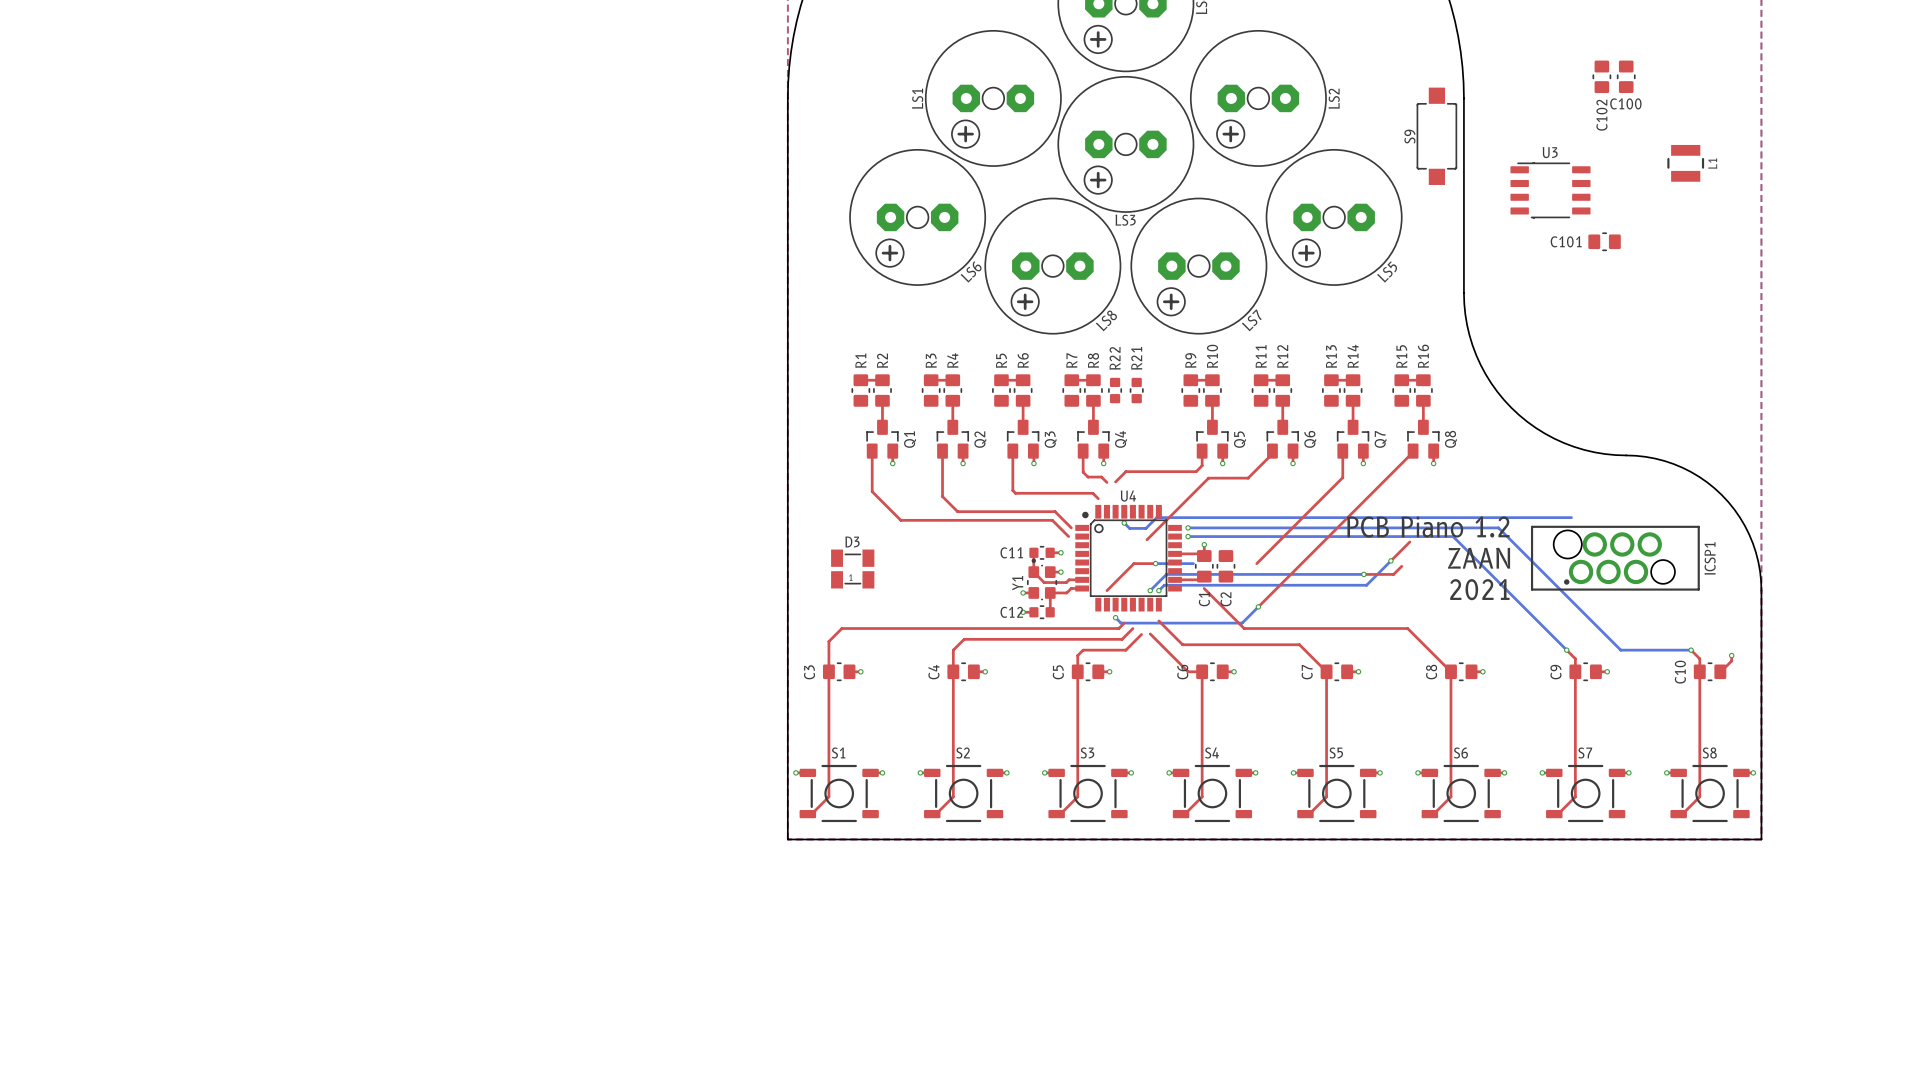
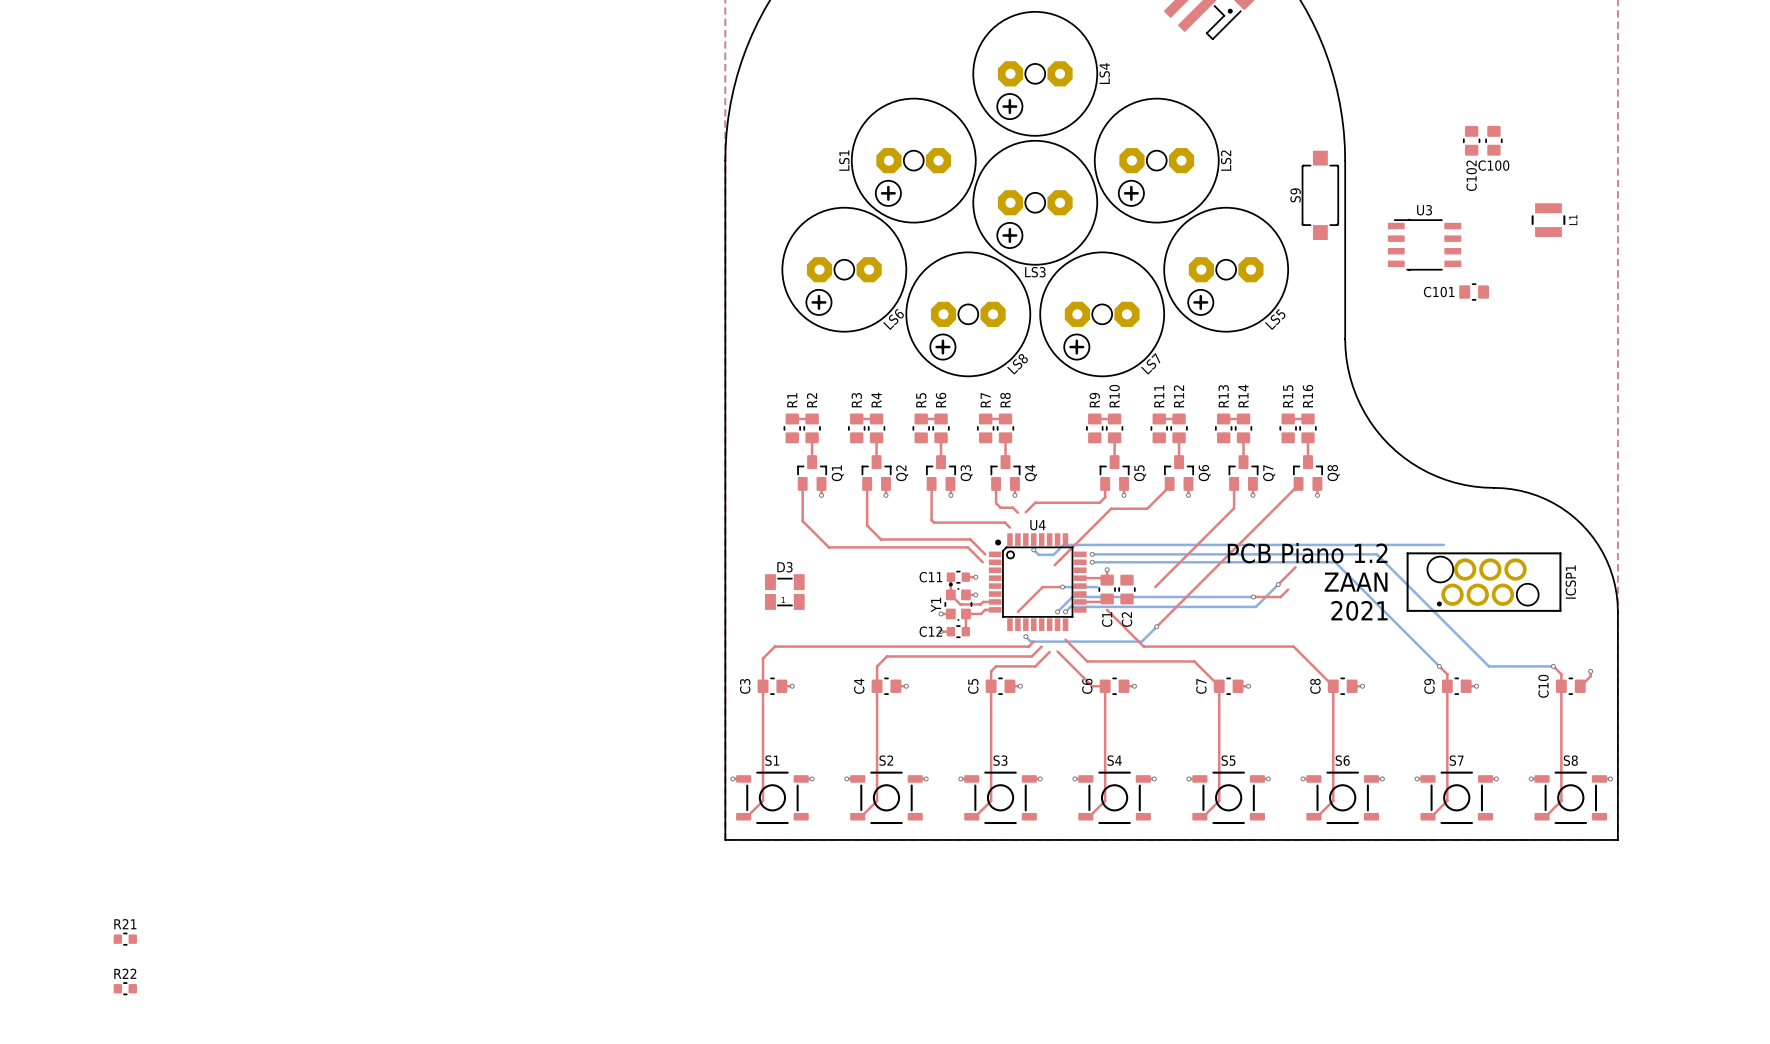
R22 rotation: 0° (1115, 390) -> 90° clockwise (125, 988)
R22 position: (1115, 390) -> (125, 988)
R21 rotation: 0° (1136, 390) -> 90° clockwise (125, 939)
R21 position: (1136, 390) -> (125, 939)

